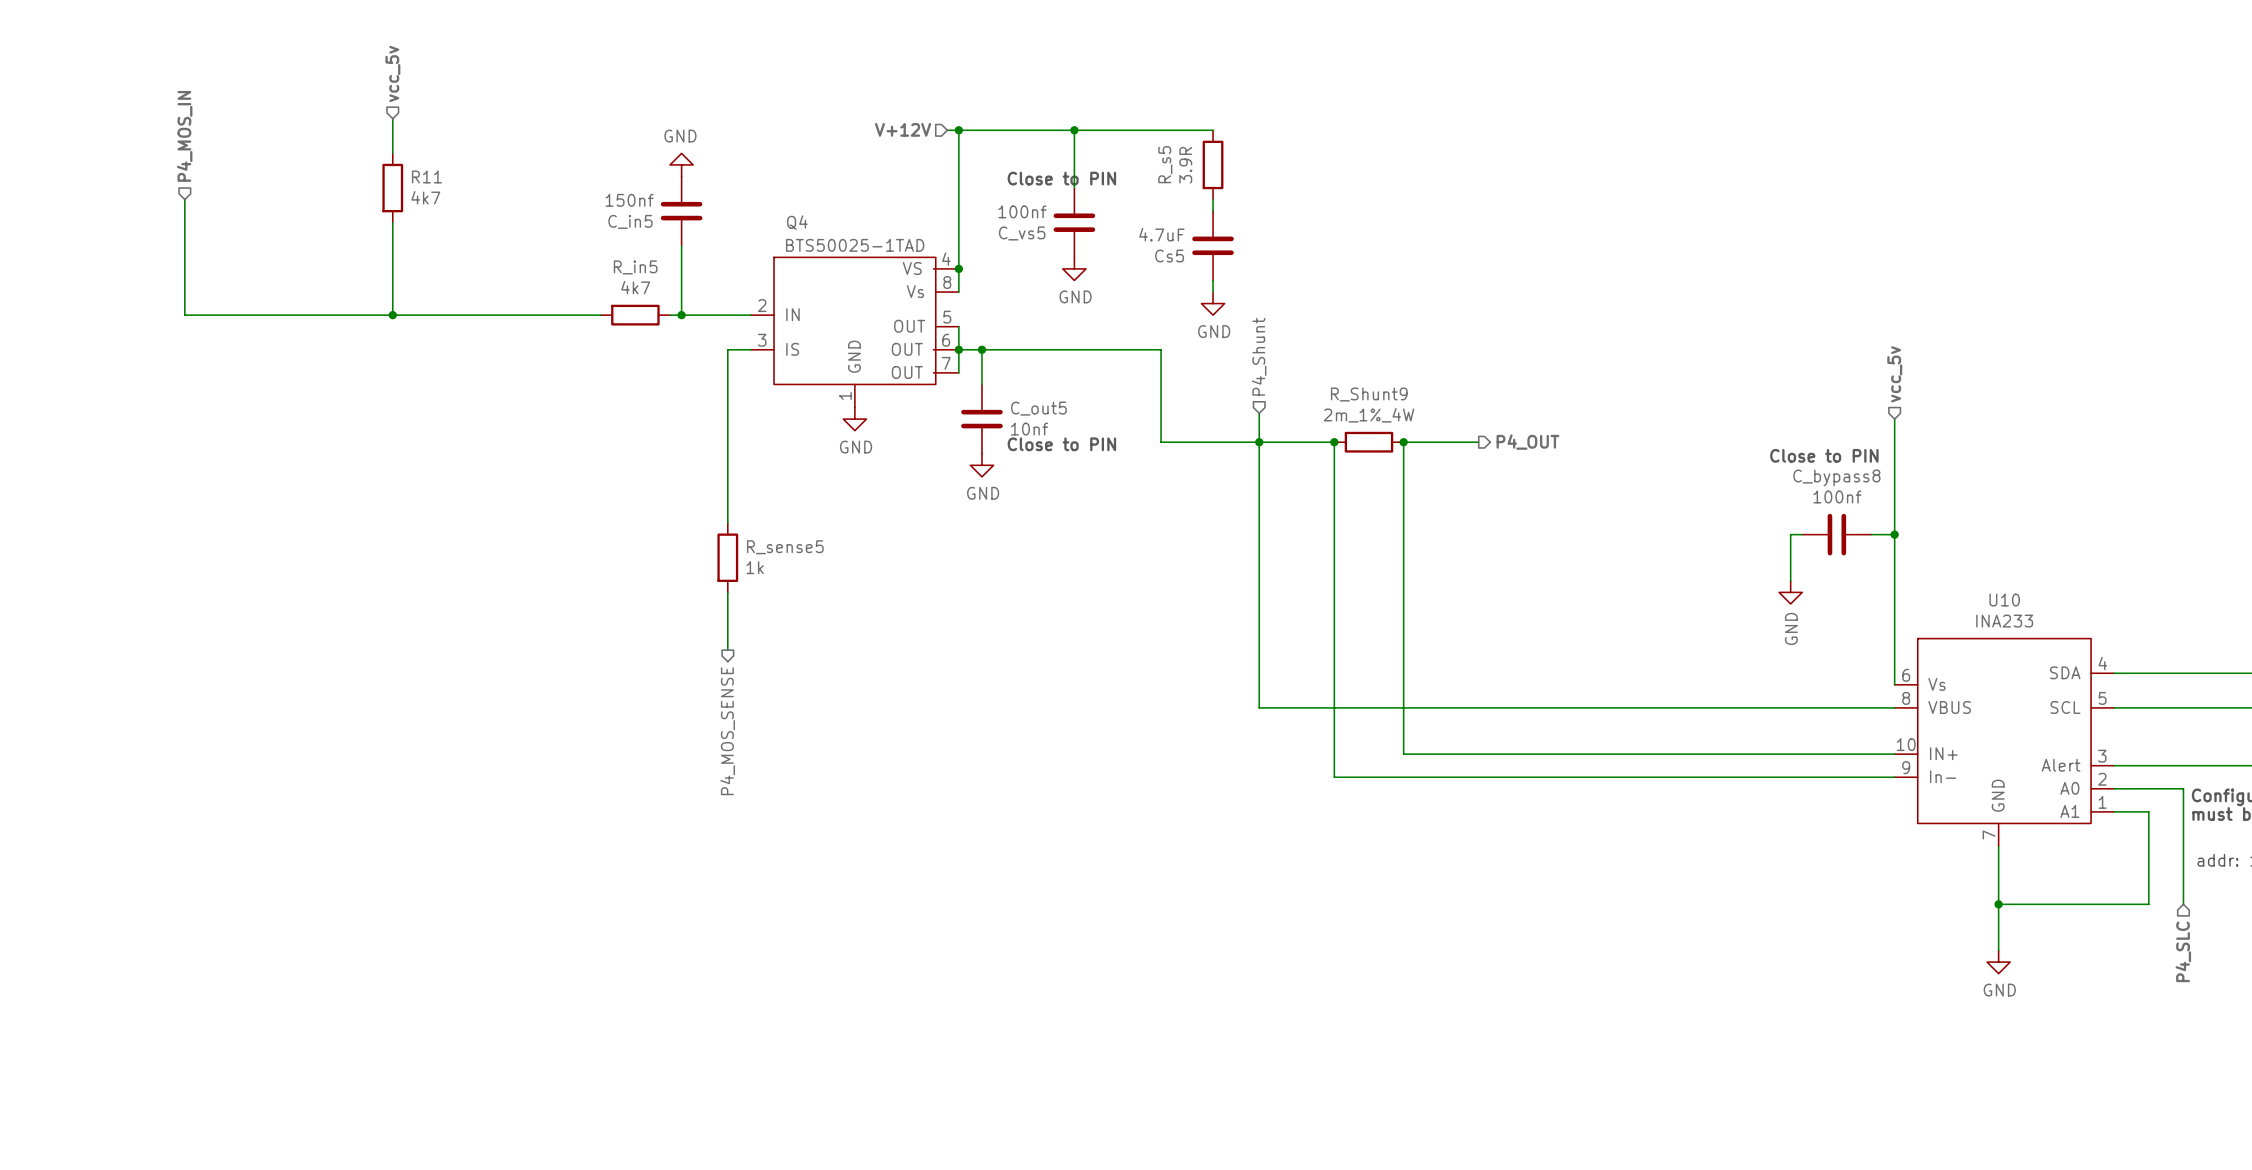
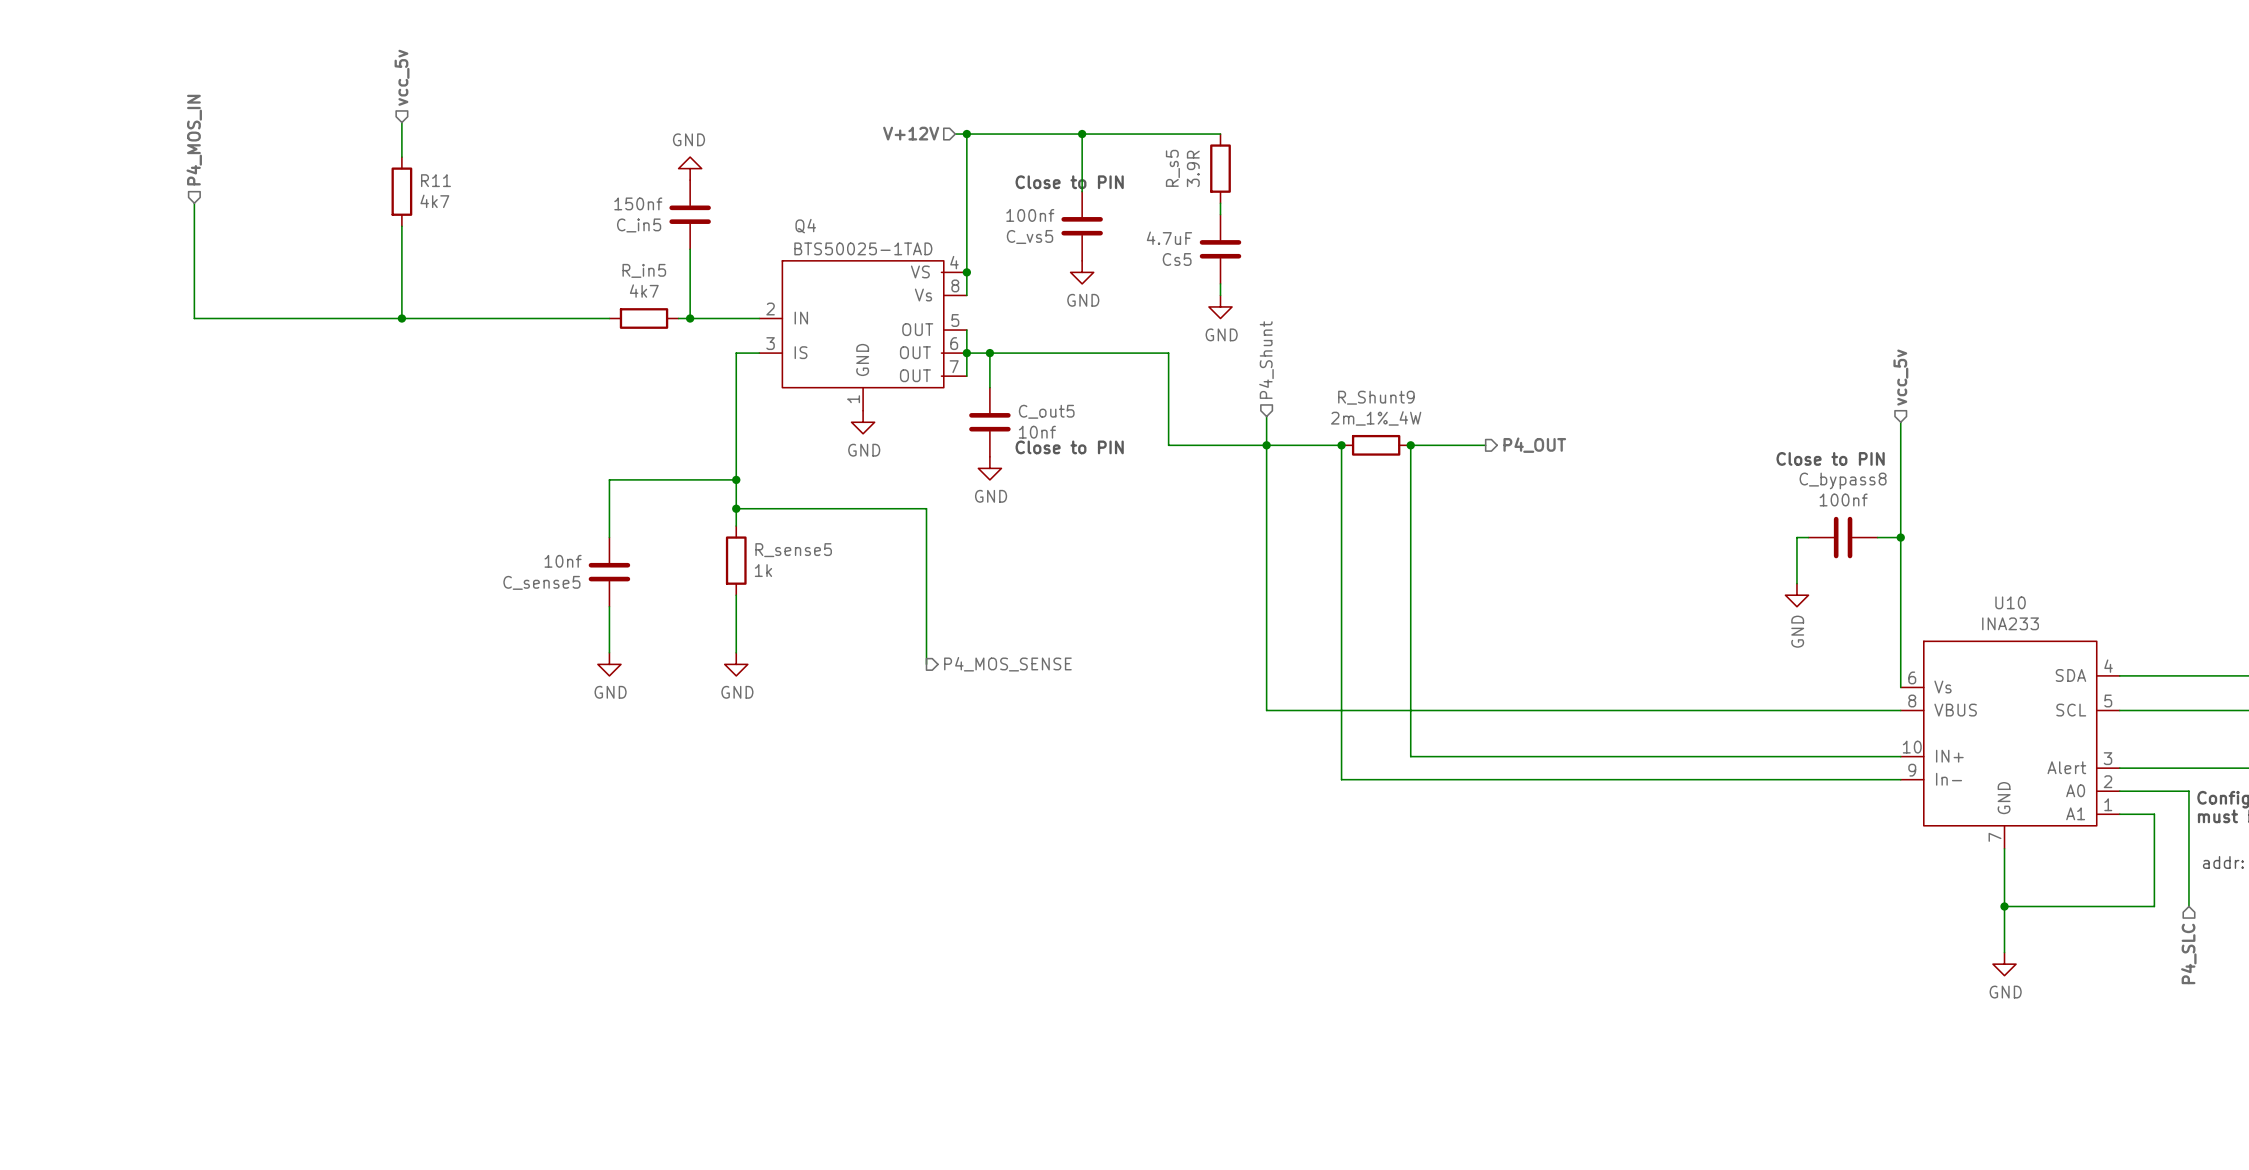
wire: none -> (736, 479) (609, 479) (609, 537)
junction: none -> (736, 479)
wire: none -> (736, 508) (926, 508) (926, 664)
junction: none -> (736, 508)
C_sense5: none -> 10nf (609, 572)
wire: none -> (609, 606) (609, 652)
power symbol: none -> GND (609, 664)
power symbol: none -> GND (736, 664)
hierarchical label rotation: 0° (727, 731) -> 90° counterclockwise (1007, 664)
hierarchical label position: P4_MOS_SENSE (727, 731) -> P4_MOS_SENSE (1007, 664)

